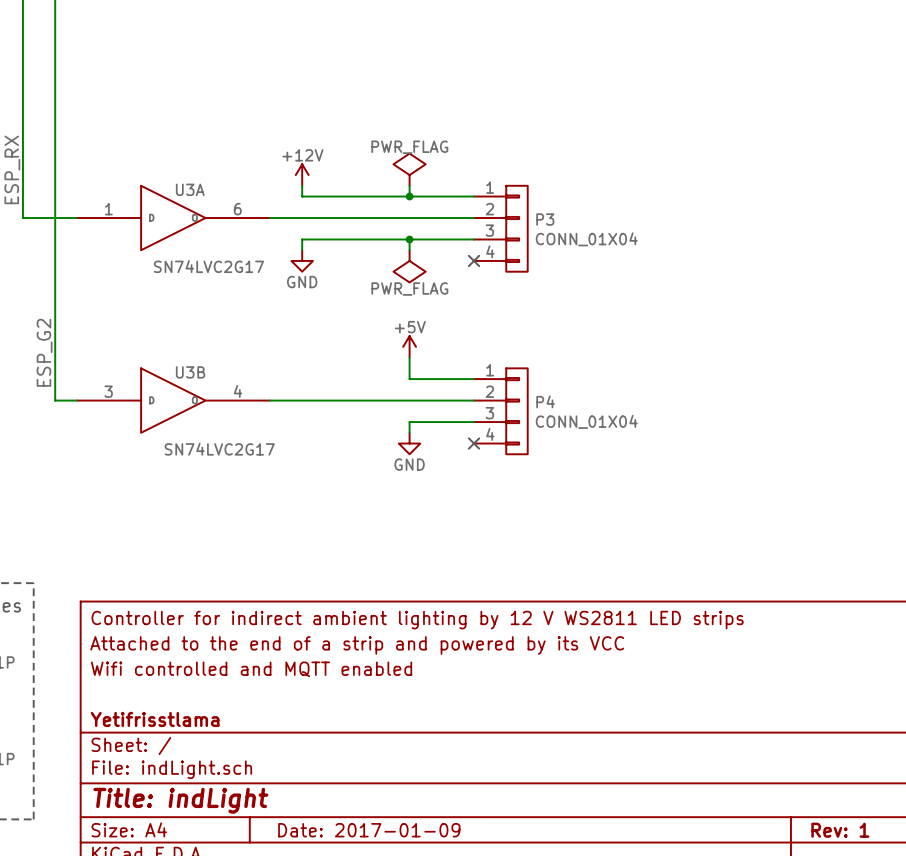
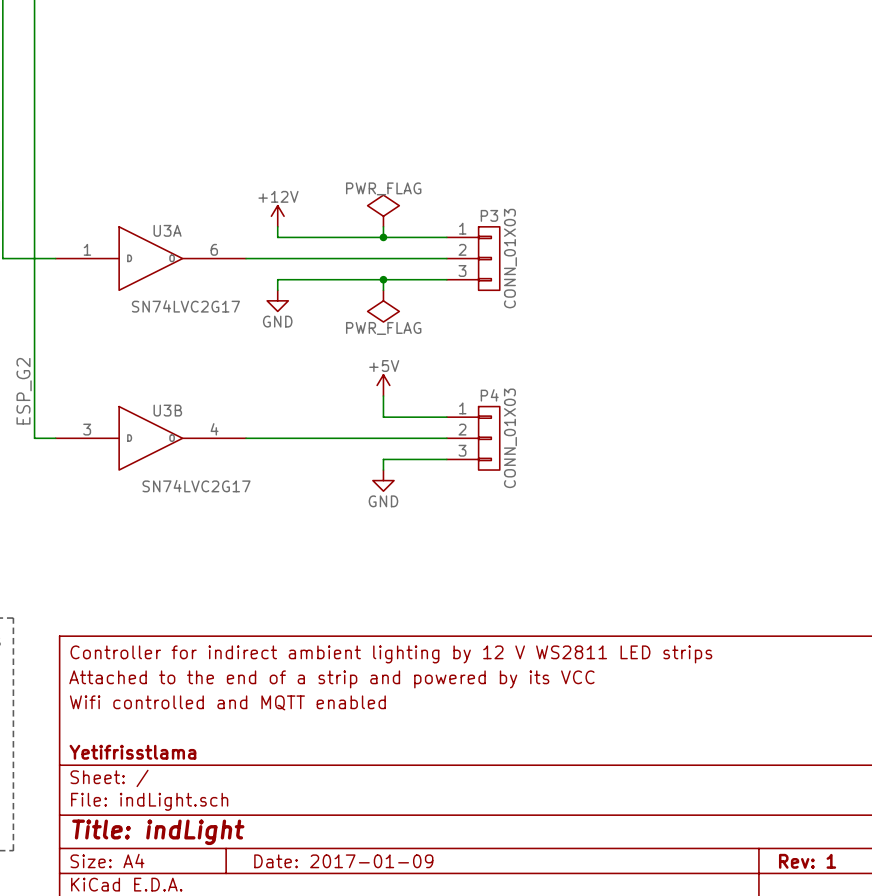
P3 symbol: [474, 185, 528, 272] -> [446, 226, 500, 291]
P3 name position: P3 (545, 219) -> P3 (489, 215)
P3 value: CONN_01X04 (586, 239) -> CONN_01X03 (510, 258)
no-connect mark: (474, 260) -> none
P4 symbol: [474, 368, 528, 455] -> [446, 406, 500, 471]
P4 name position: P4 (545, 401) -> P4 (489, 395)
P4 value: CONN_01X04 (586, 421) -> CONN_01X03 (510, 438)
no-connect mark: (474, 443) -> none

